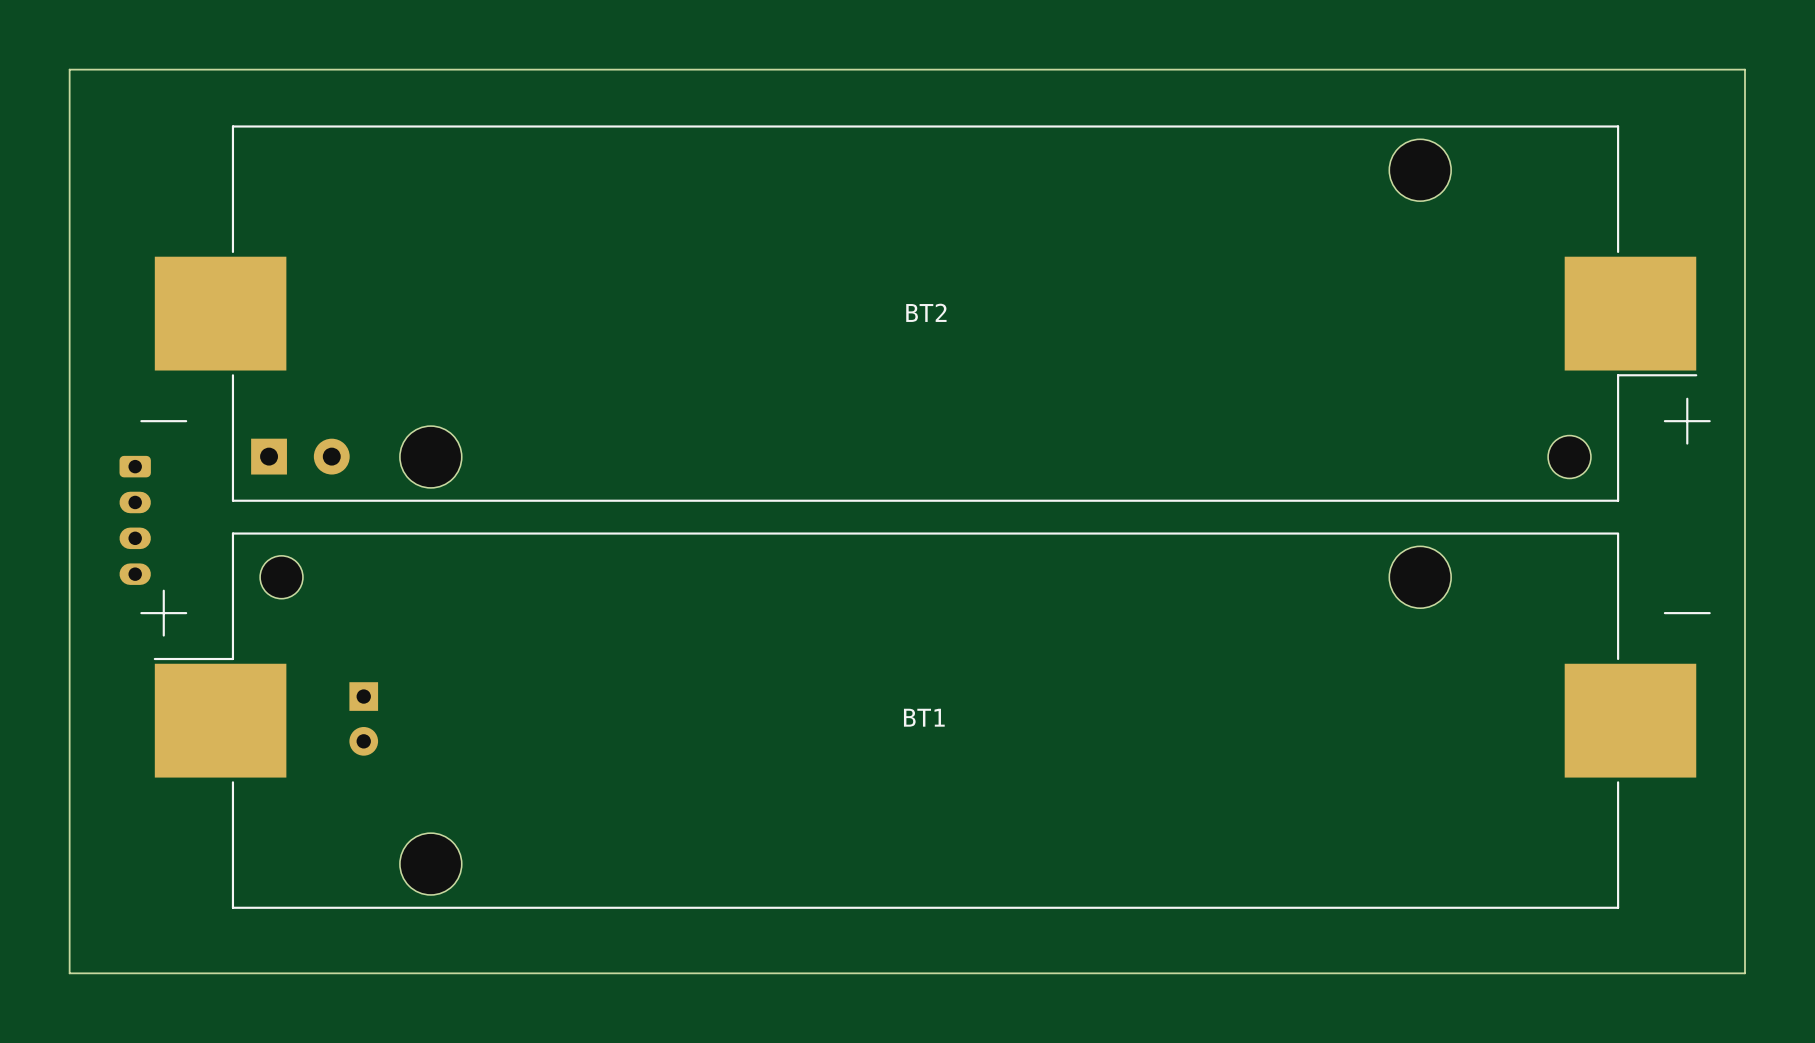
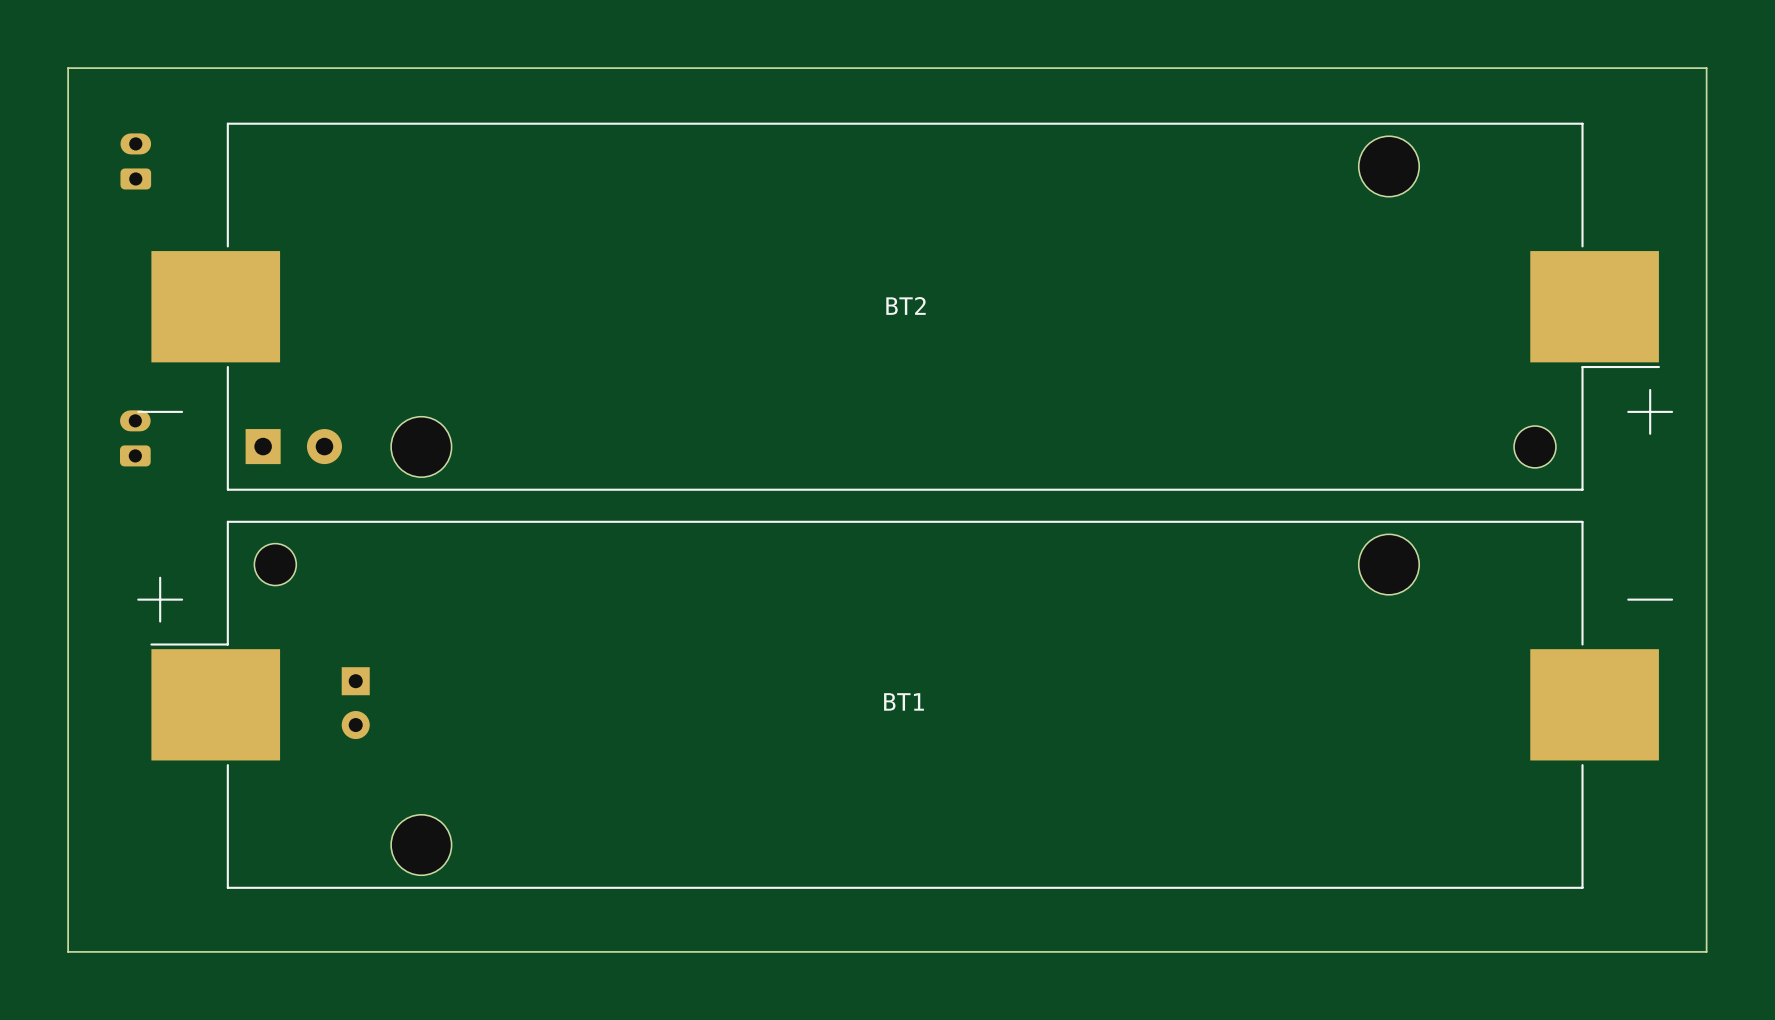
part: none -> (135, 161)
part: none -> (135, 438)
part: (135, 520) -> none

